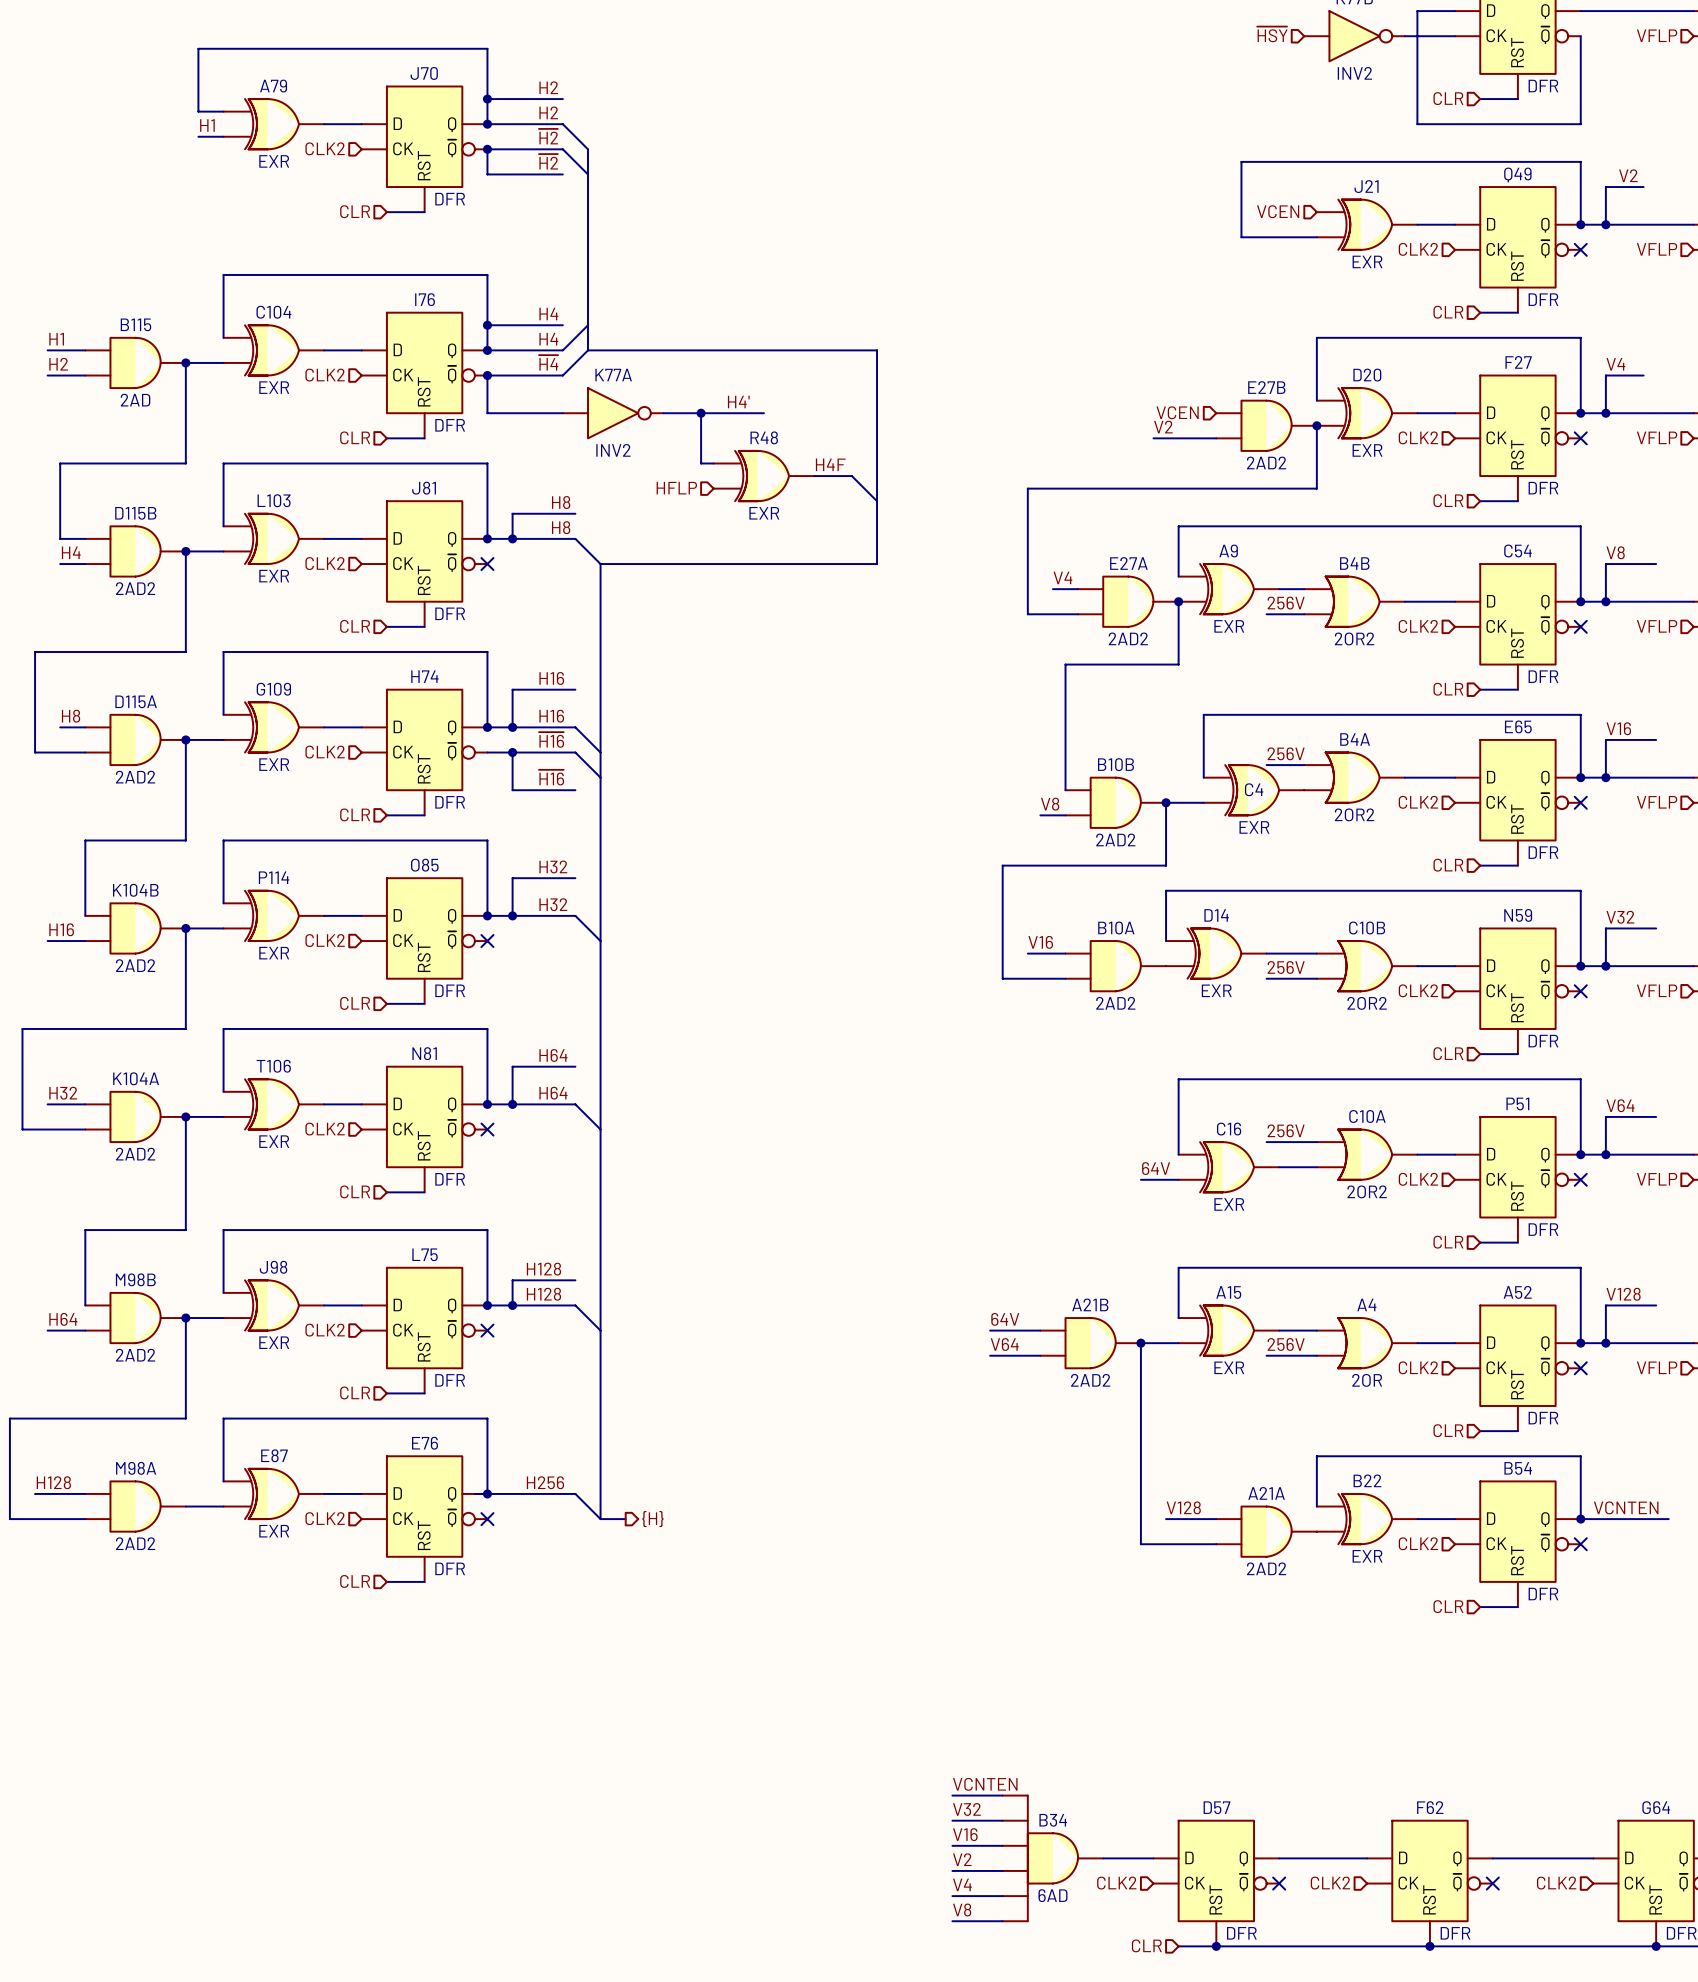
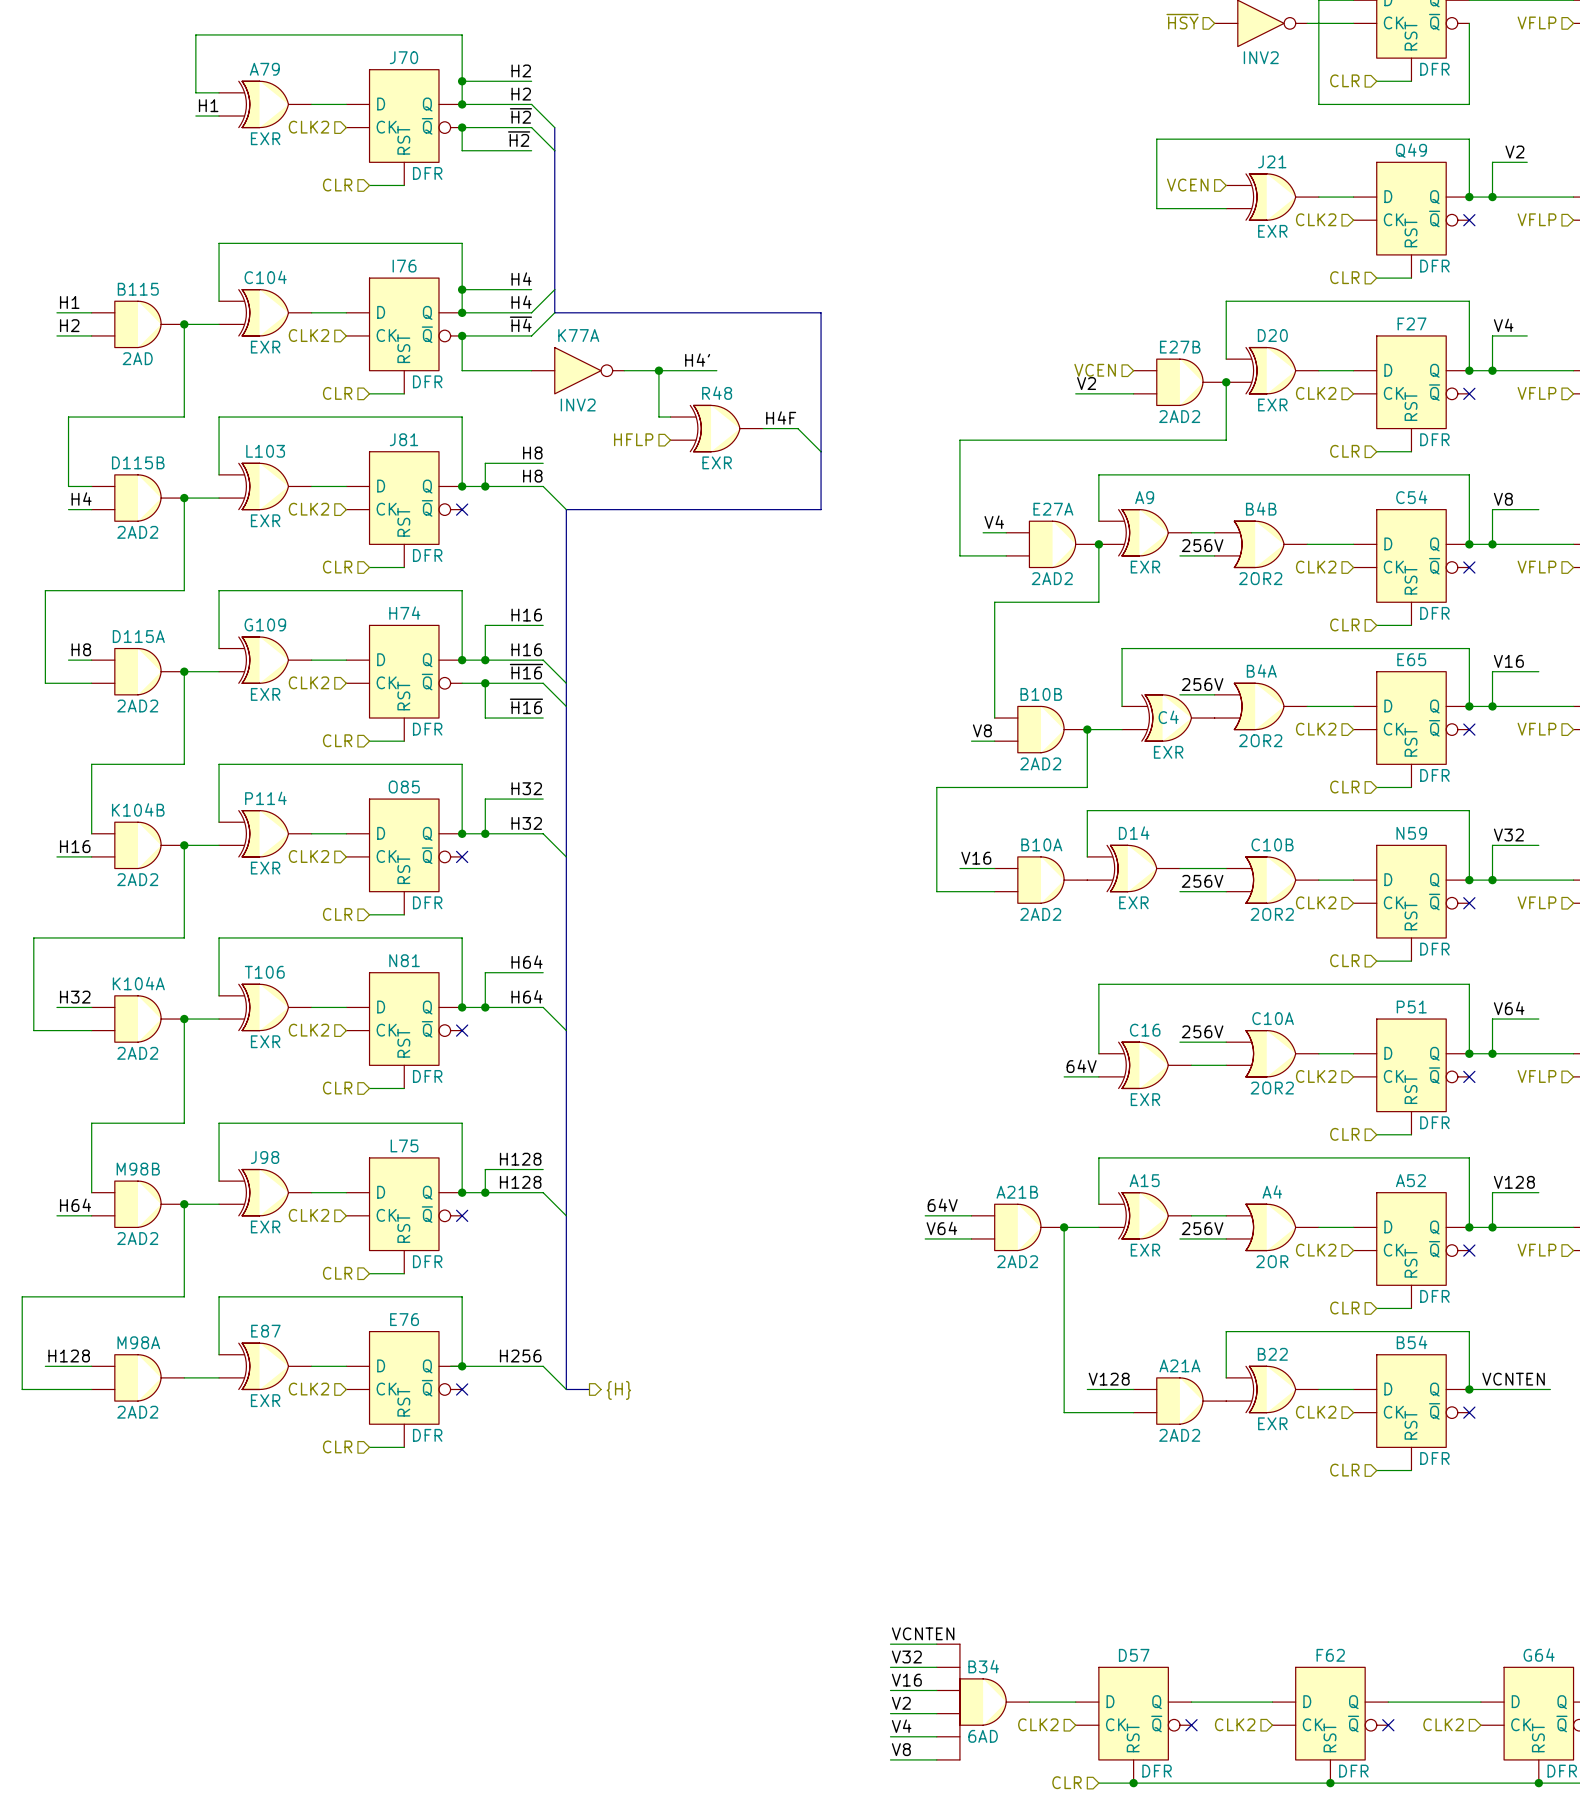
label position: ~{H2} (548, 161) -> ~{H2} (519, 139)

